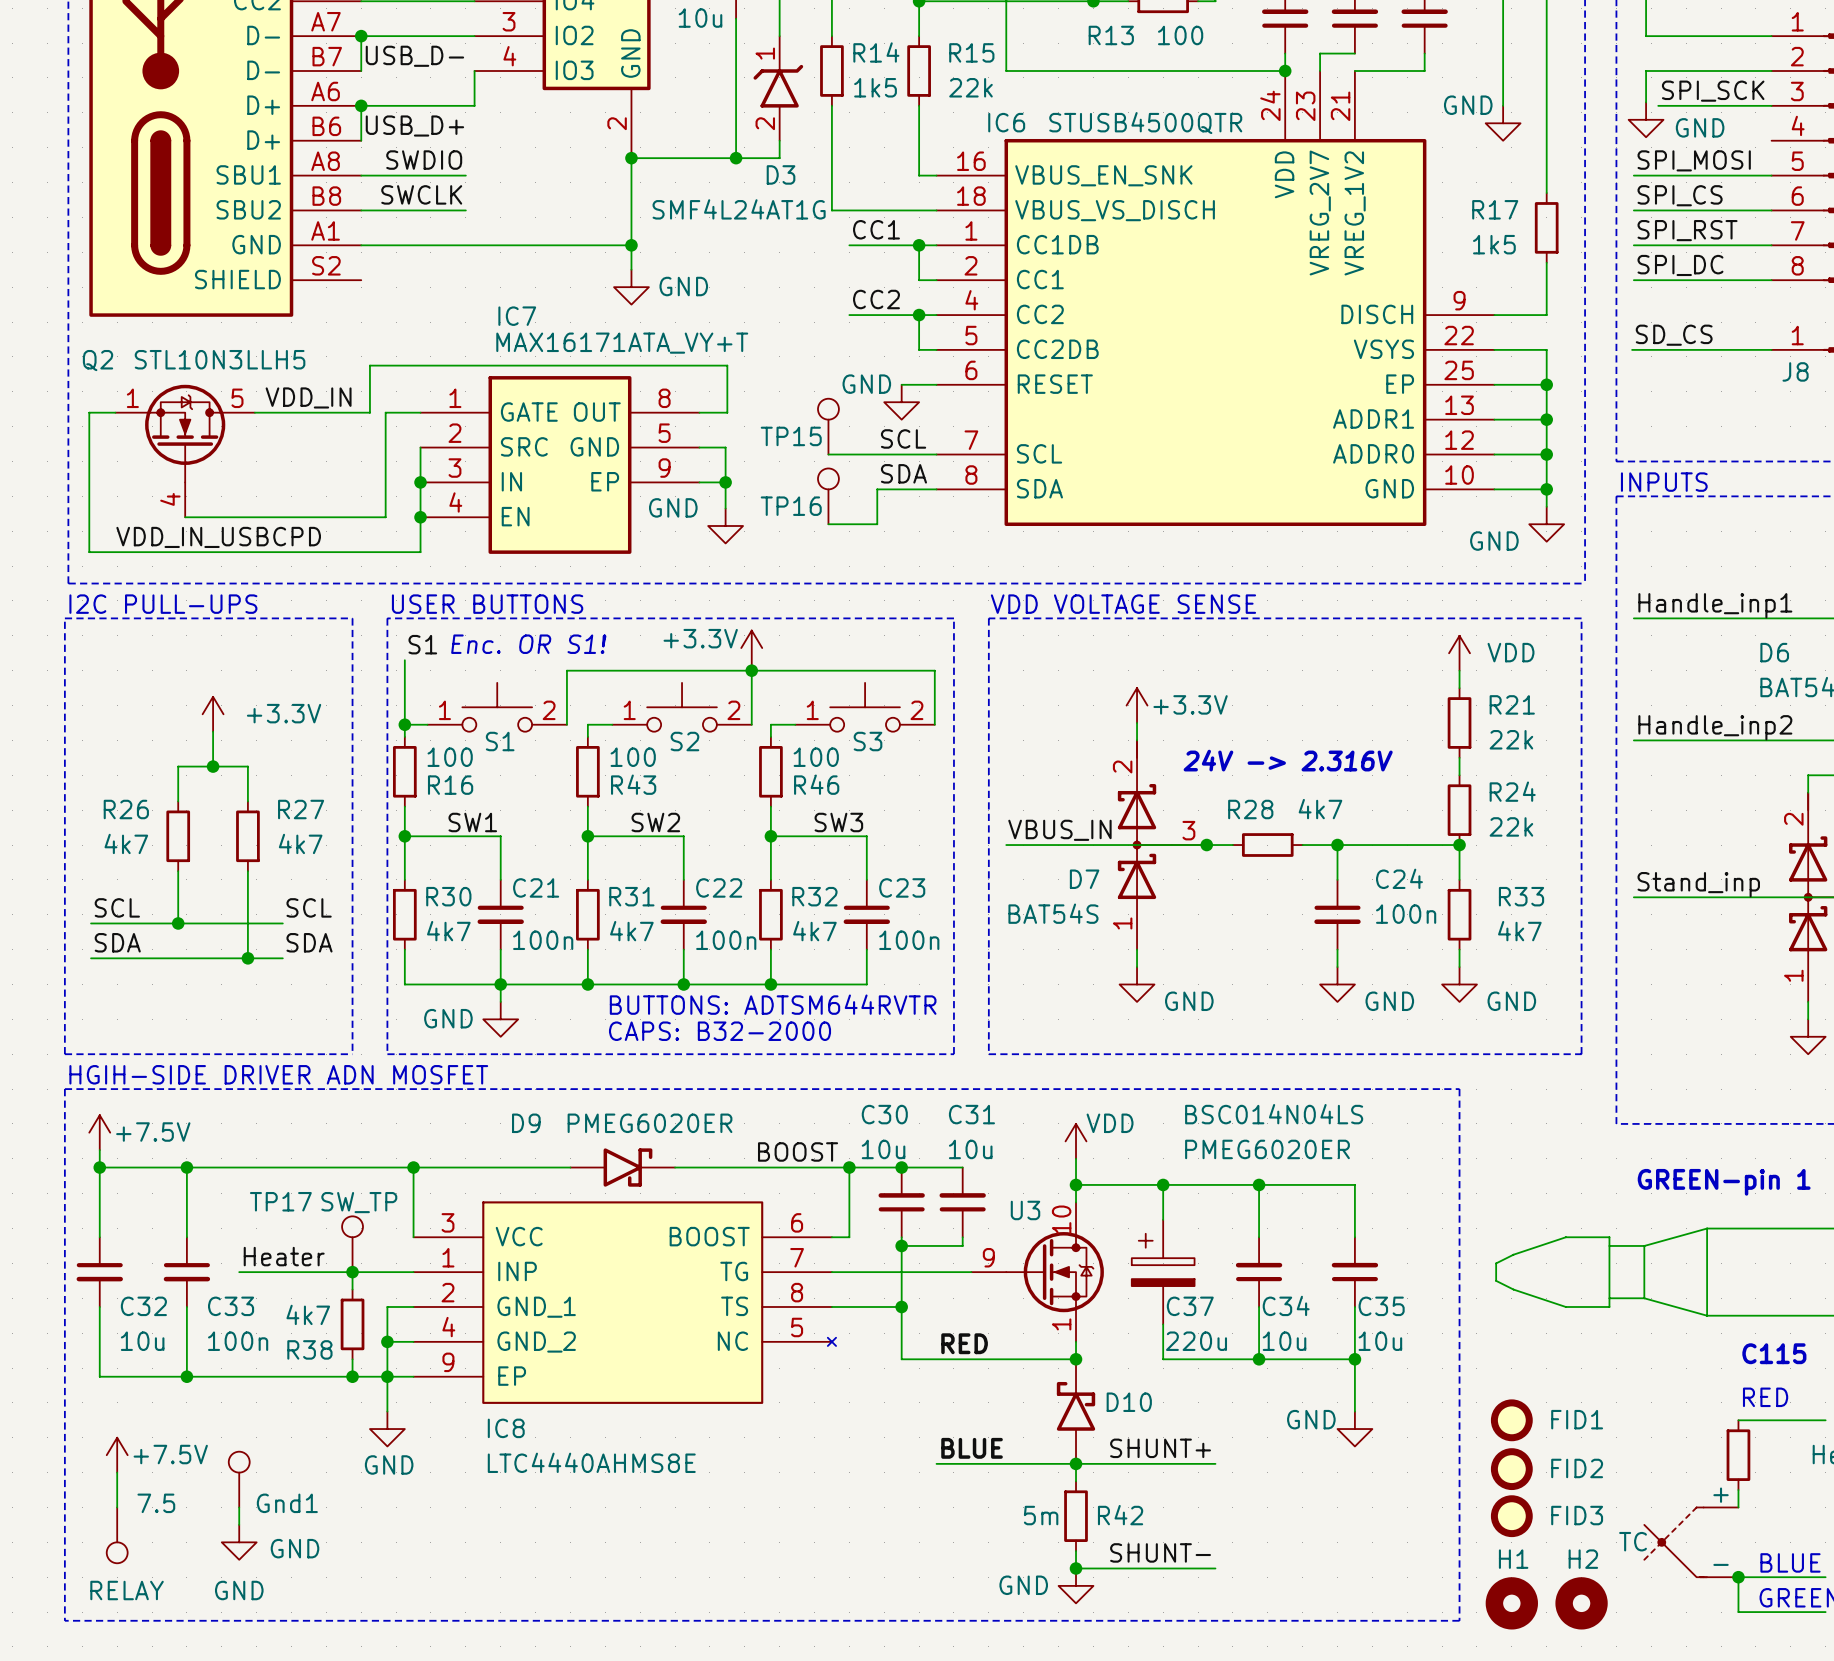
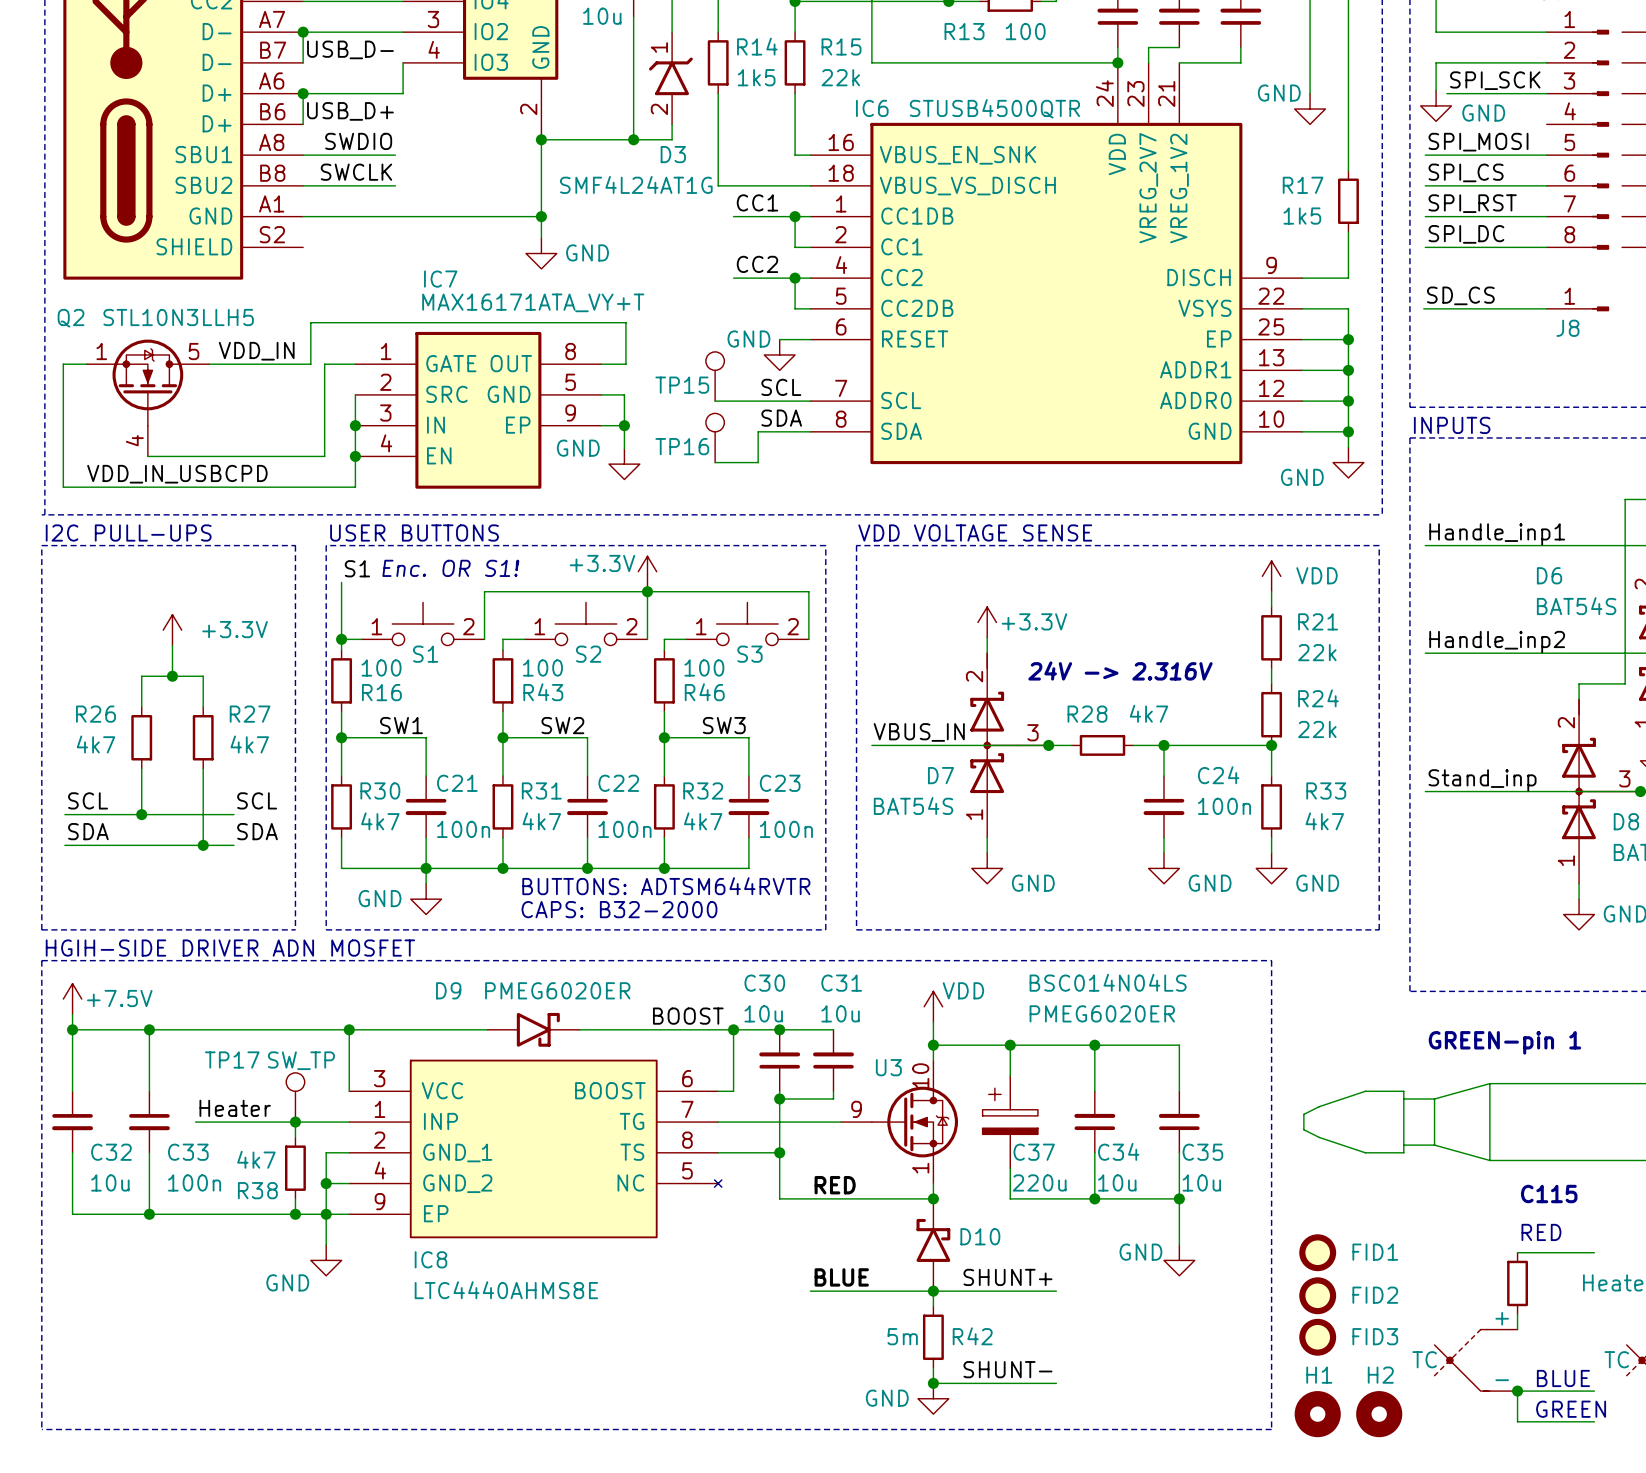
power symbol: +7.5V (117, 1455) -> none
power symbol text position: GND (389, 1464) -> GND (287, 1282)
wire: (117, 1472) (117, 1507) -> none
Gnd1: GND (239, 1479) -> none
wire: (239, 1507) (239, 1524) -> none
7.5: RELAY (117, 1535) -> none
power symbol: GND (239, 1542) -> none

